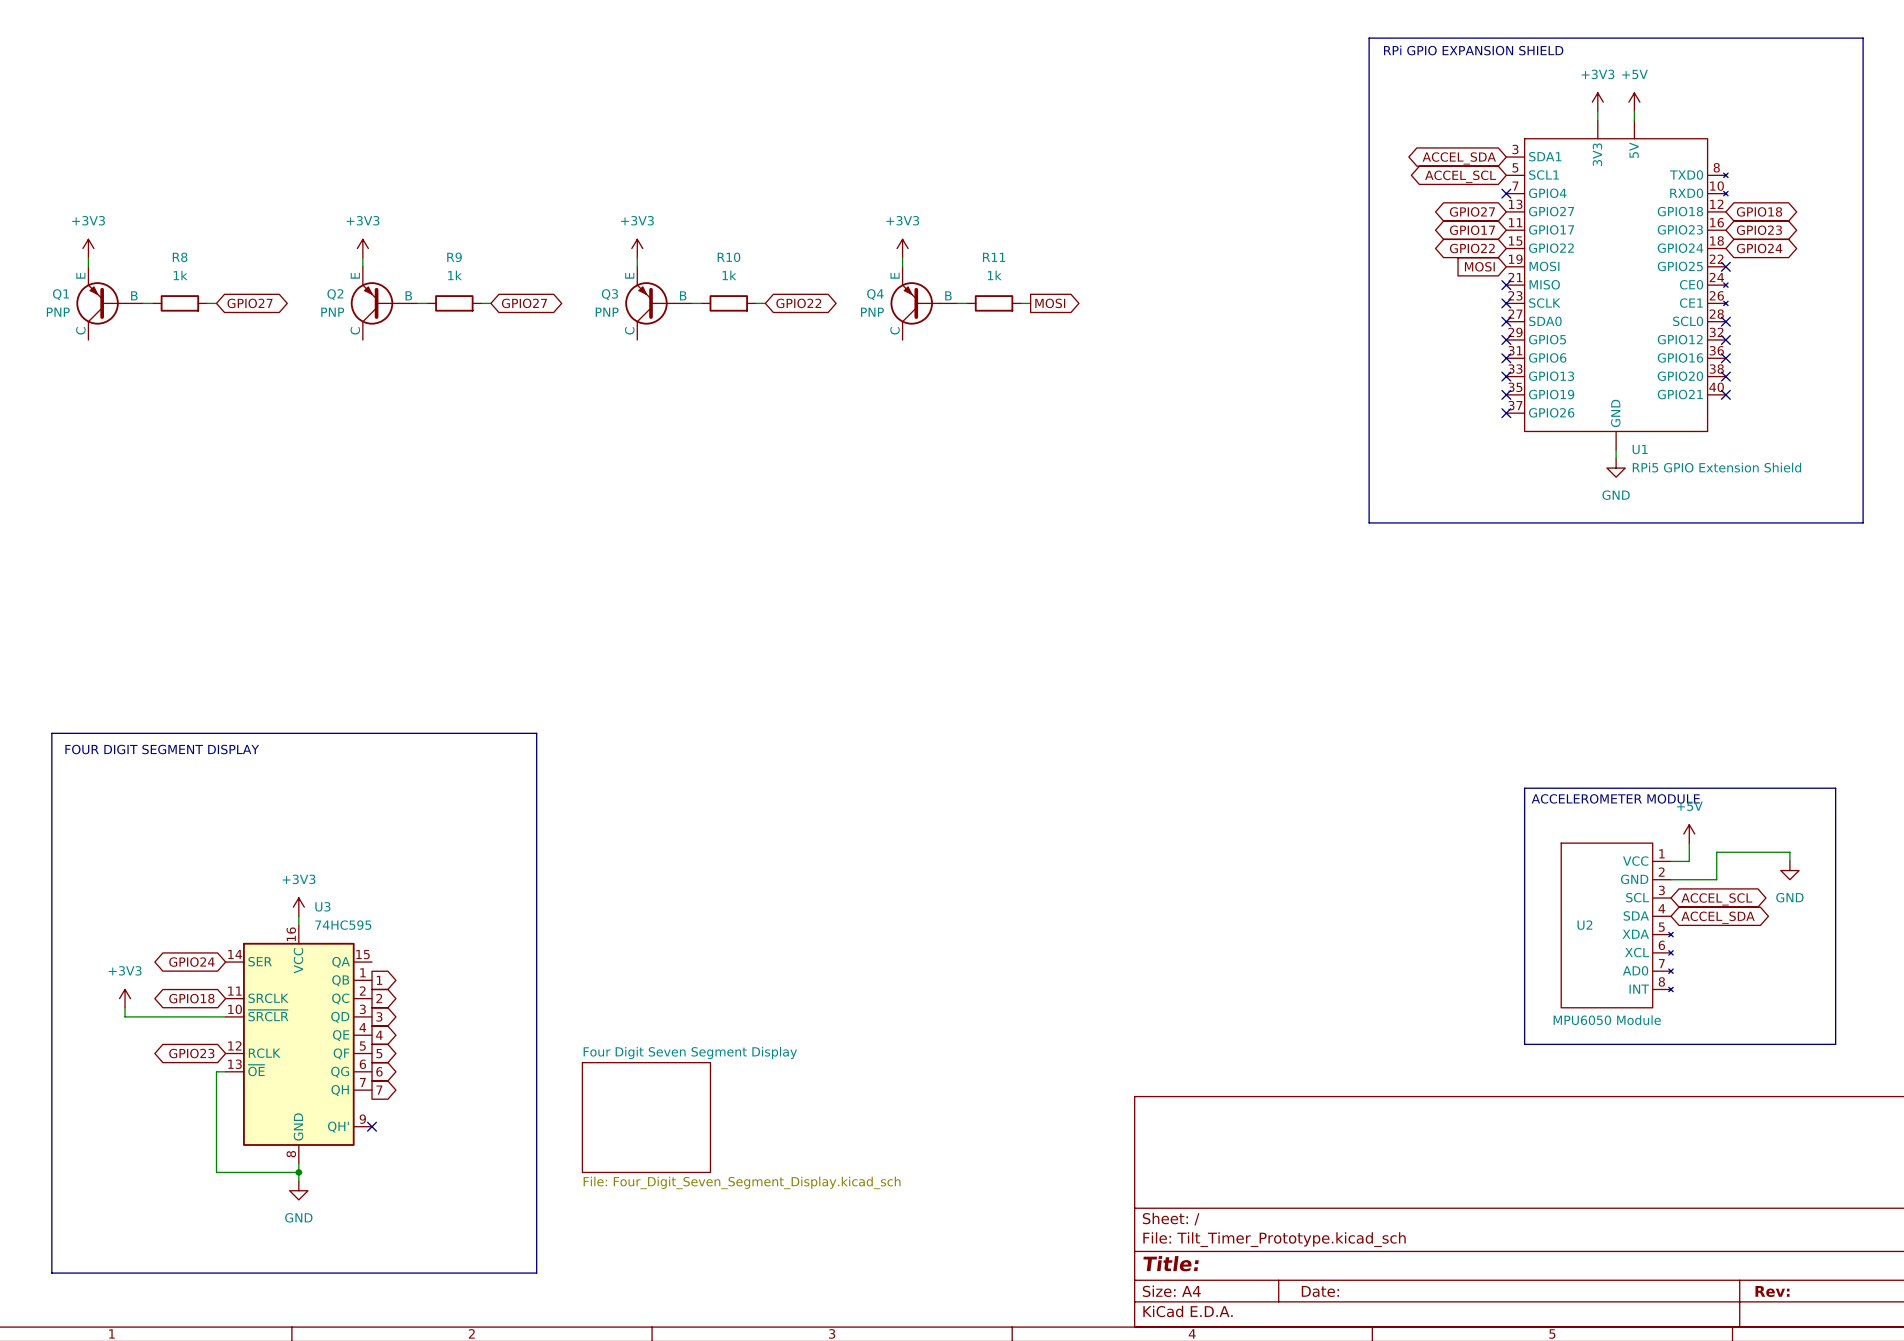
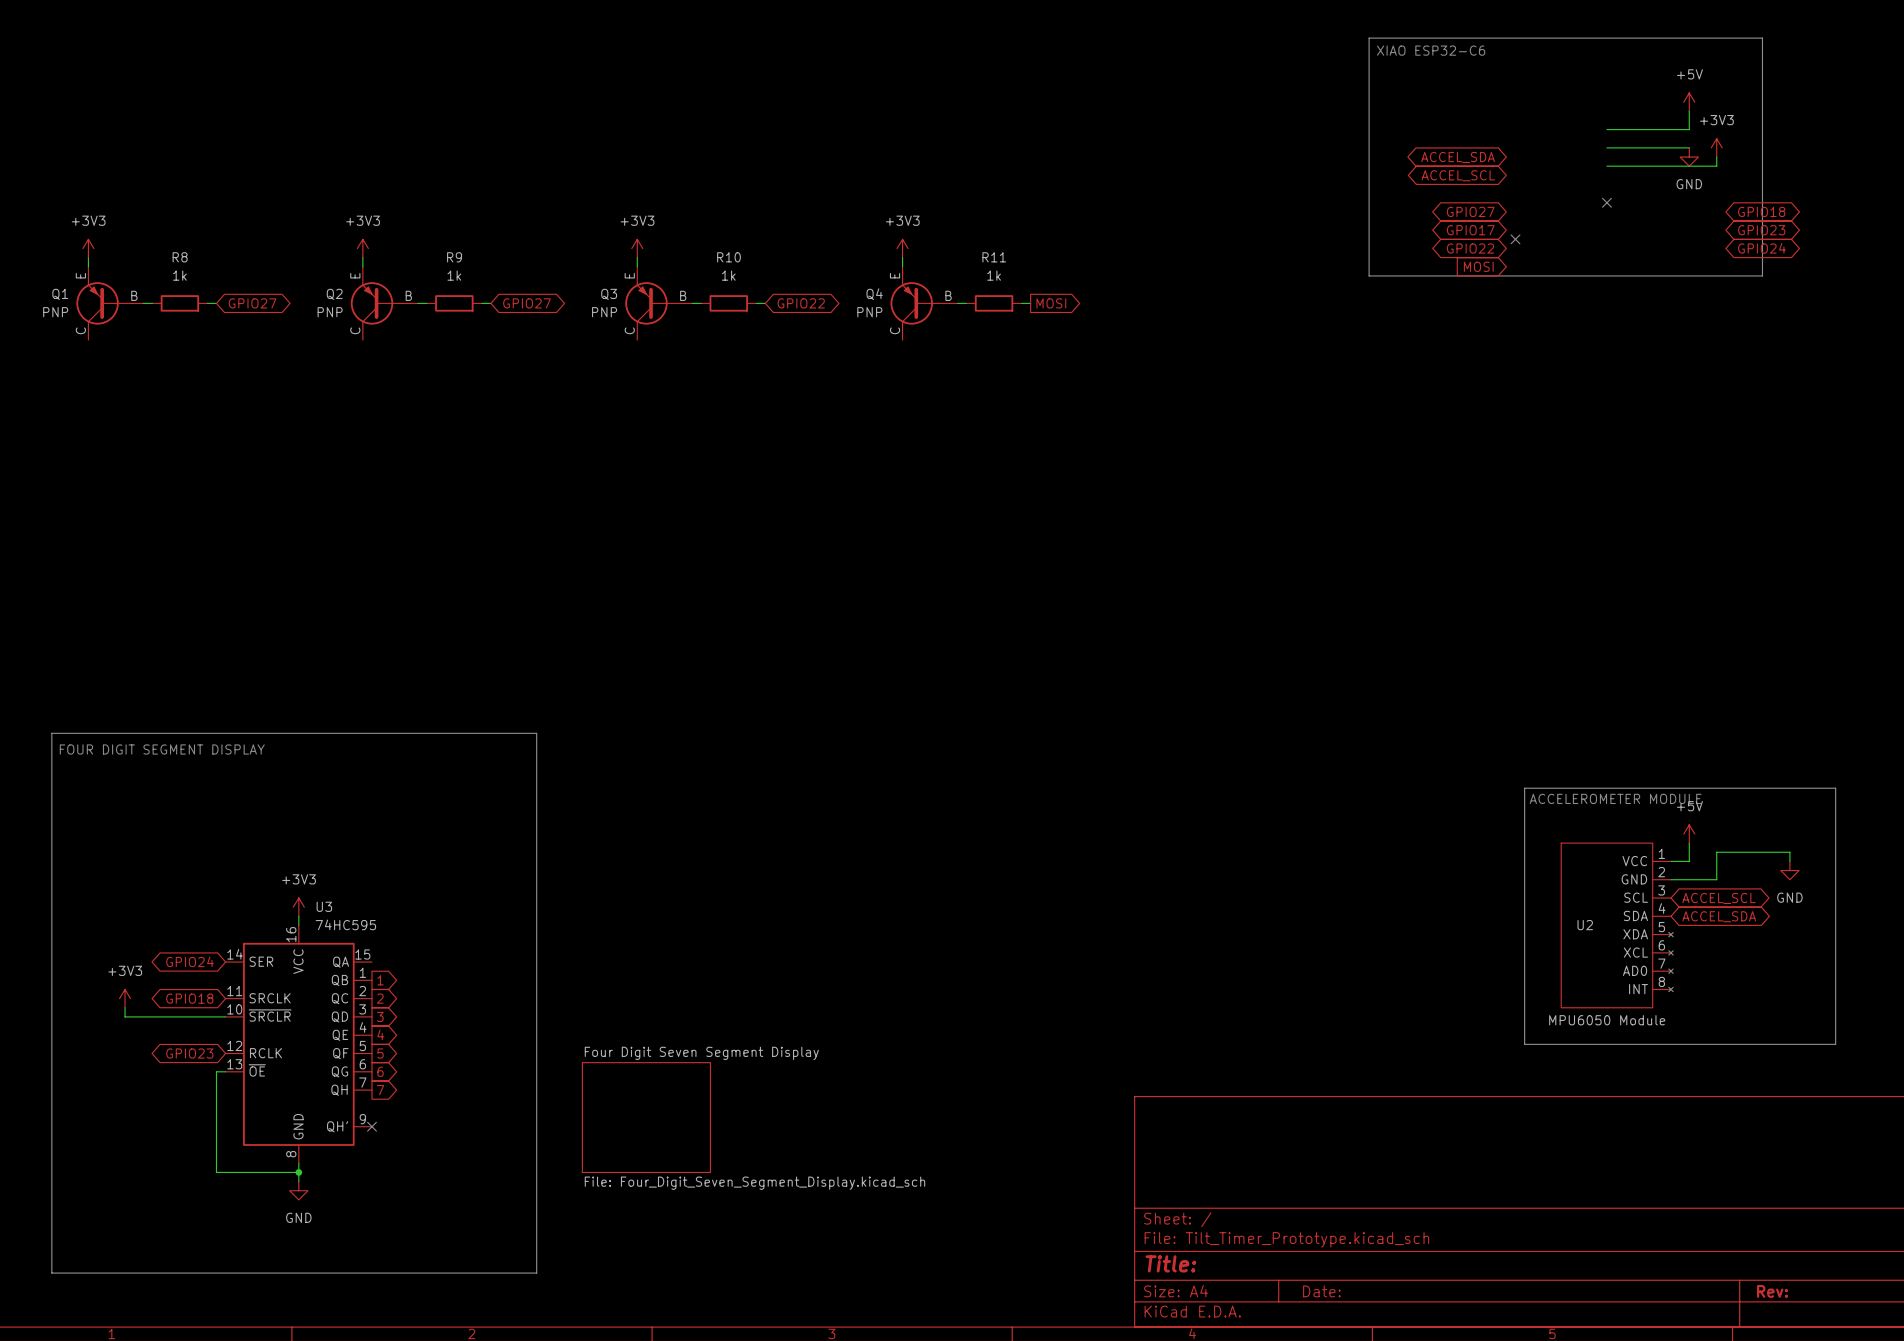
line: (1762, 38) (1863, 38) (1863, 522) (1369, 522) (1369, 275) -> (1762, 38) (1762, 275) (1369, 275)
text: none -> XIAO ESP32-C6 (1431, 50)
text: RPi GPIO EXPANSION SHIELD (1473, 50) -> none
power symbol position: +3V3 (1597, 102) -> +3V3 (1716, 147)
power symbol position: +5V (1634, 102) -> +5V (1689, 102)
wire: (1597, 111) (1597, 120) -> none
wire: (1634, 111) (1634, 120) -> none
wire: none -> (1689, 111) (1689, 129) (1606, 129)
wire: none -> (1606, 147) (1689, 147)
power symbol: none -> GND (1689, 157)
wire: none -> (1716, 157) (1716, 166) (1606, 166)
no-connect mark: (1506, 193) -> none
no-connect mark: none -> (1606, 202)
no-connect mark: none -> (1515, 239)
no-connect mark: (1725, 266) -> none
no-connect mark: (1506, 285) -> none
U1: RPi5 GPIO Extension Shield (1617, 285) -> none
no-connect mark: (1506, 303) -> none
no-connect mark: (1506, 321) -> none
no-connect mark: (1725, 321) -> none
no-connect mark: (1506, 339) -> none
no-connect mark: (1725, 339) -> none
no-connect mark: (1506, 358) -> none
no-connect mark: (1725, 358) -> none
no-connect mark: (1506, 376) -> none
no-connect mark: (1725, 376) -> none
no-connect mark: (1506, 394) -> none
no-connect mark: (1725, 394) -> none
no-connect mark: (1506, 413) -> none
wire: (1616, 449) (1616, 458) -> none
power symbol: GND (1616, 468) -> none

